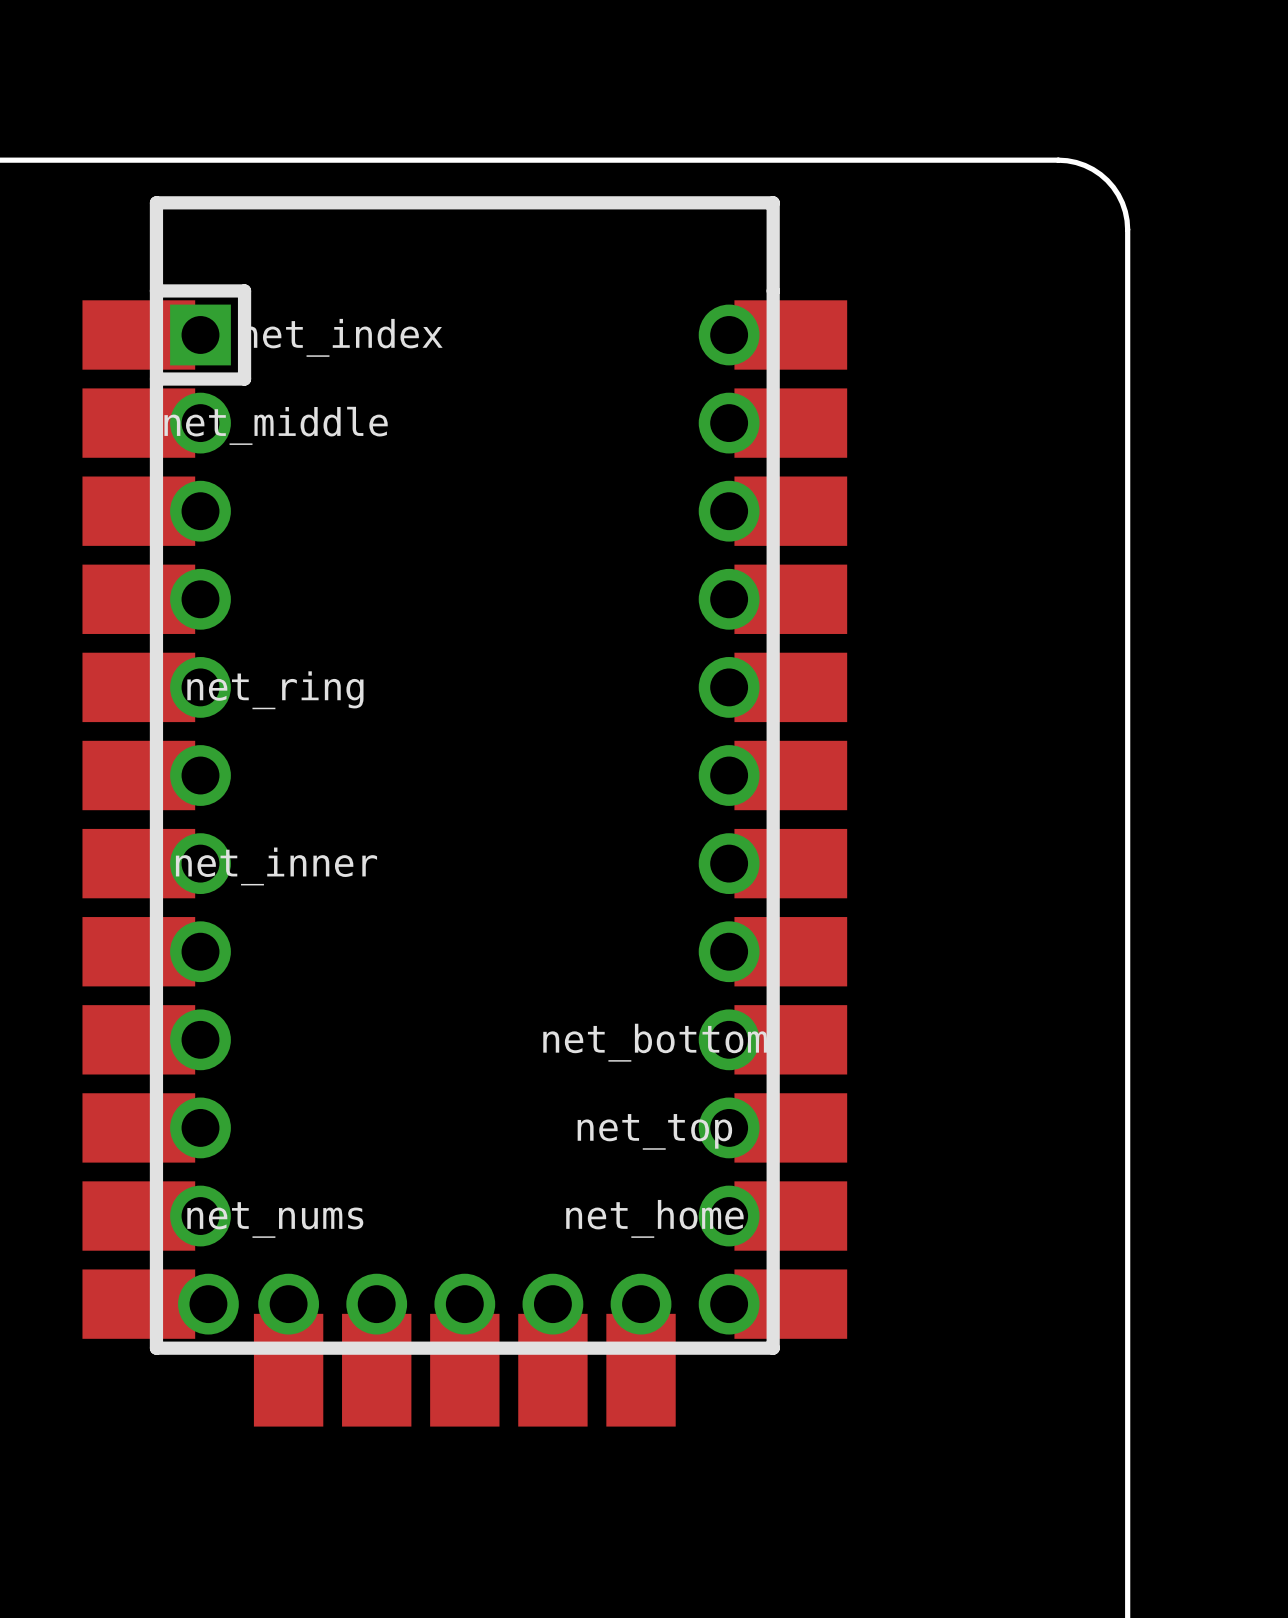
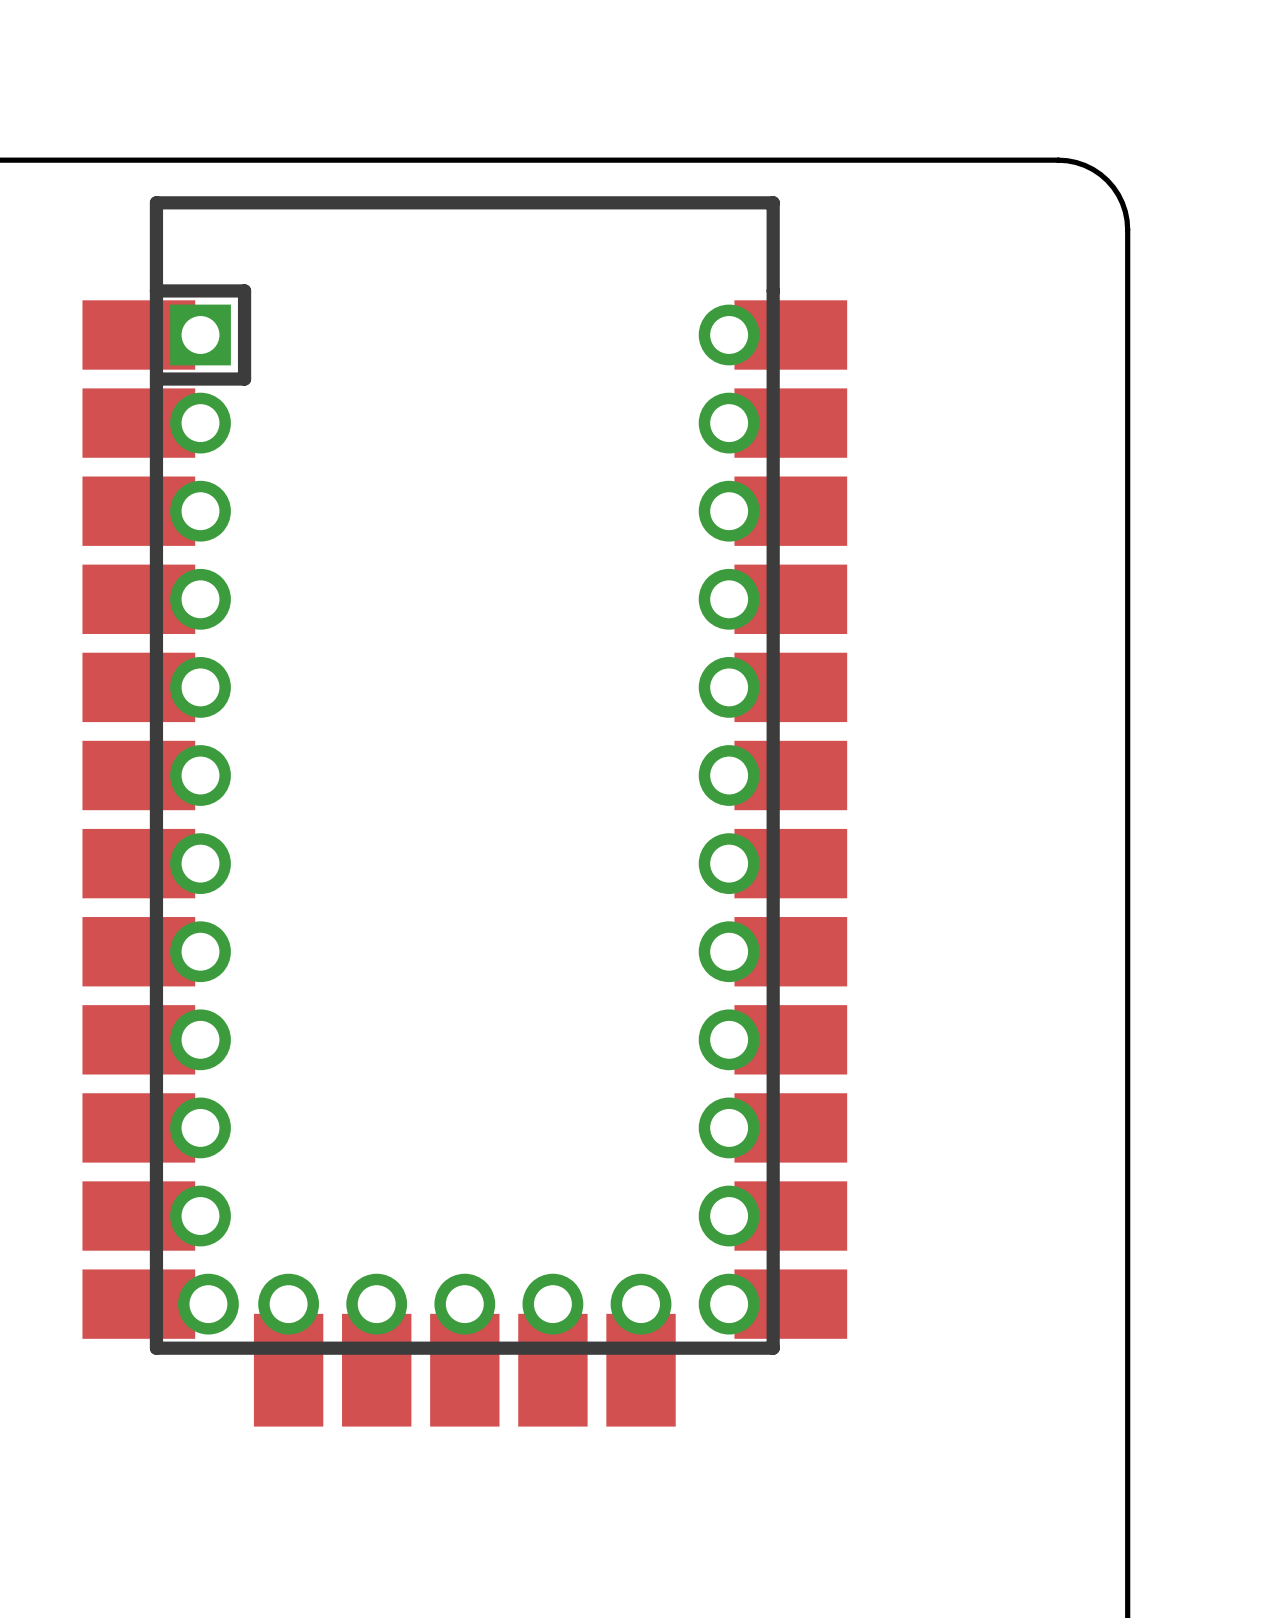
part text: net_index (342, 337) -> none
part text: net_middle (276, 425) -> none
part text: net_ring (275, 690) -> none
part text: net_inner (276, 866) -> none
part text: net_bottom (655, 1042) -> none
part text: net_top (654, 1131) -> none
part text: net_home (654, 1218) -> none
part text: net_nums (275, 1219) -> none

